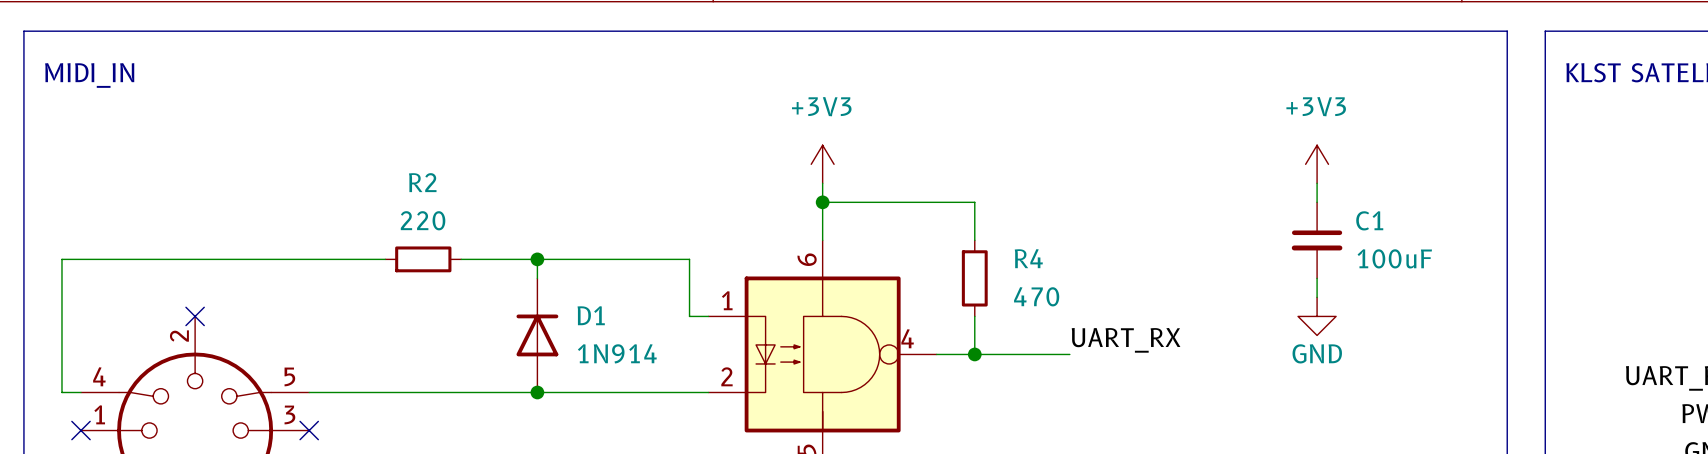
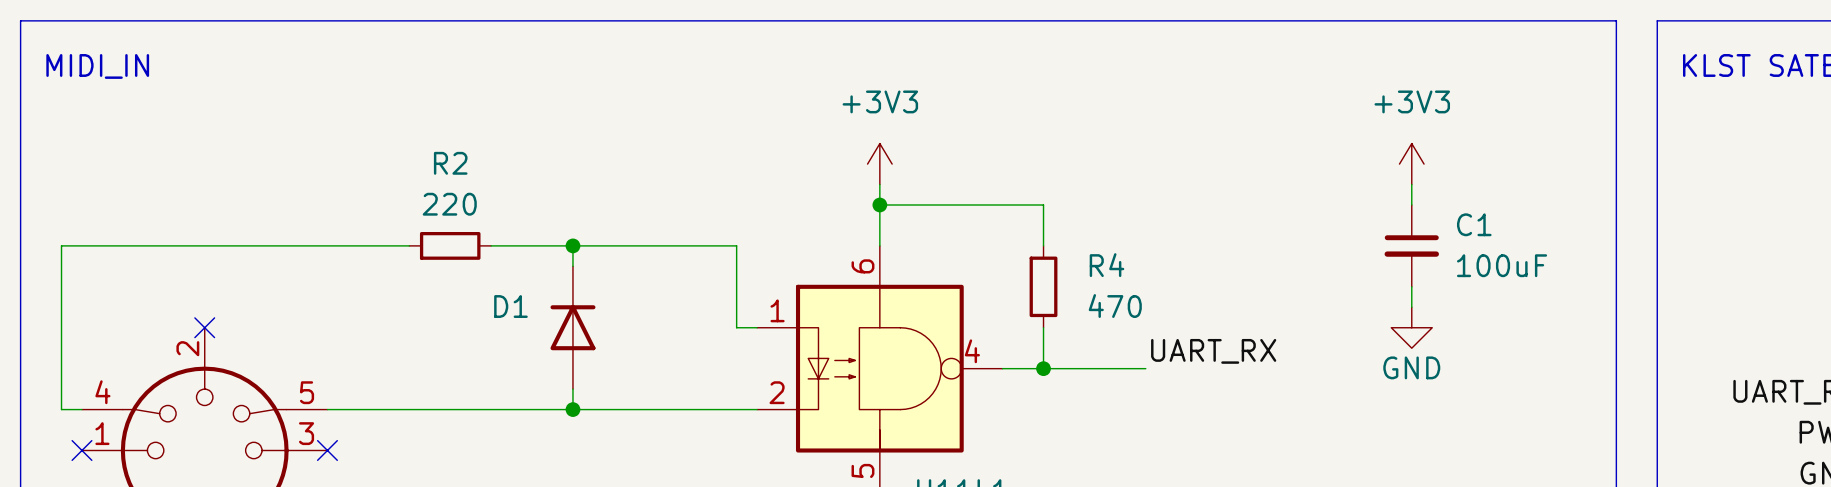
wire: (61, 259) (385, 259) -> (61, 266) (61, 245) (409, 245)
R2 position: (423, 259) -> (450, 245)
wire: (461, 259) (689, 259) -> (491, 245) (736, 245) (736, 266)
junction position: (537, 259) -> (572, 245)
D1 name position: D1 (591, 315) -> D1 (510, 306)
D1 position: (537, 335) -> (572, 327)
D1 value: 1N914 (617, 353) -> none

